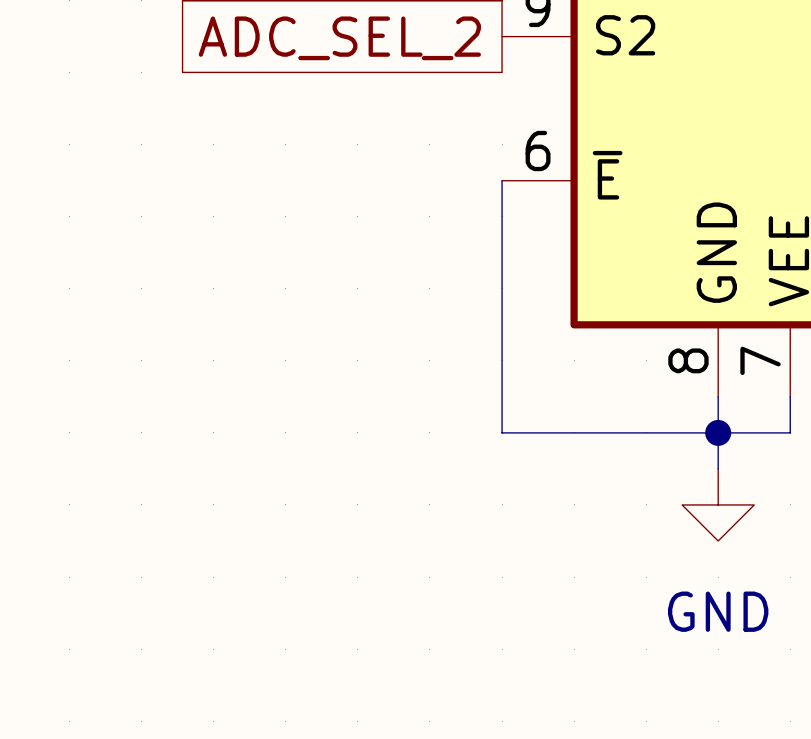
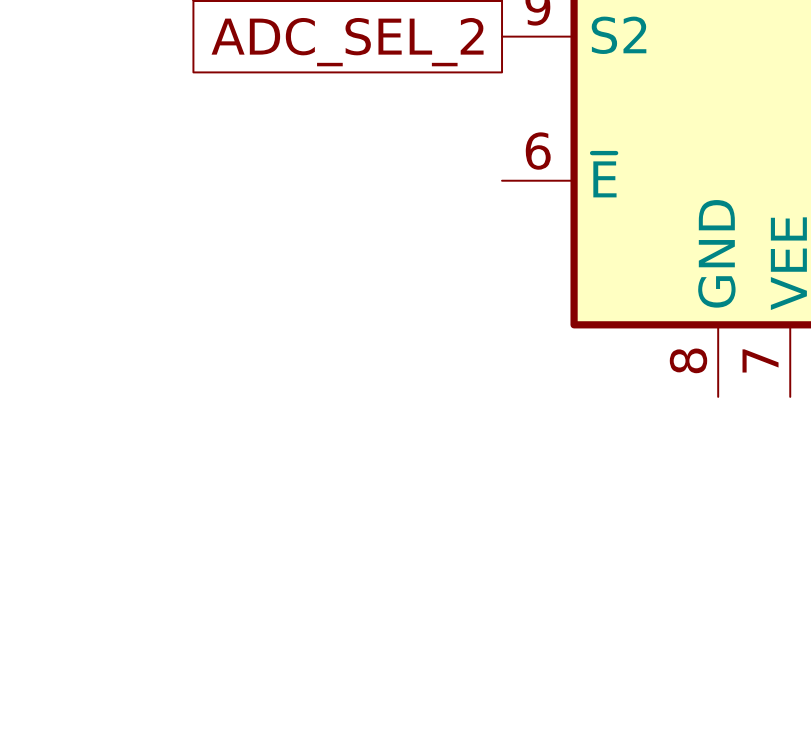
wire: (502, 180) (502, 432) (790, 432) (790, 396) -> none
wire: (718, 396) (718, 468) -> none
junction: (718, 432) -> none
power symbol: GND (718, 504) -> none

